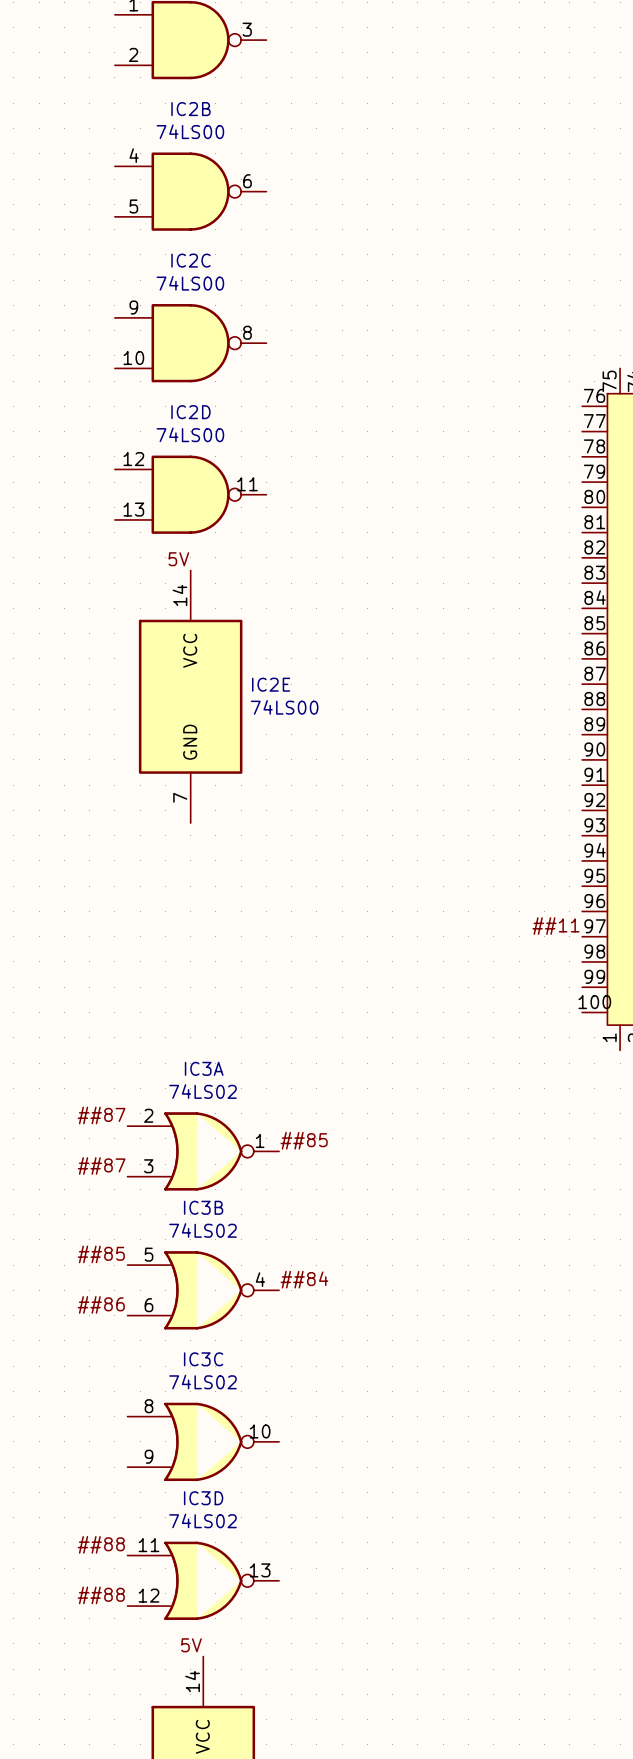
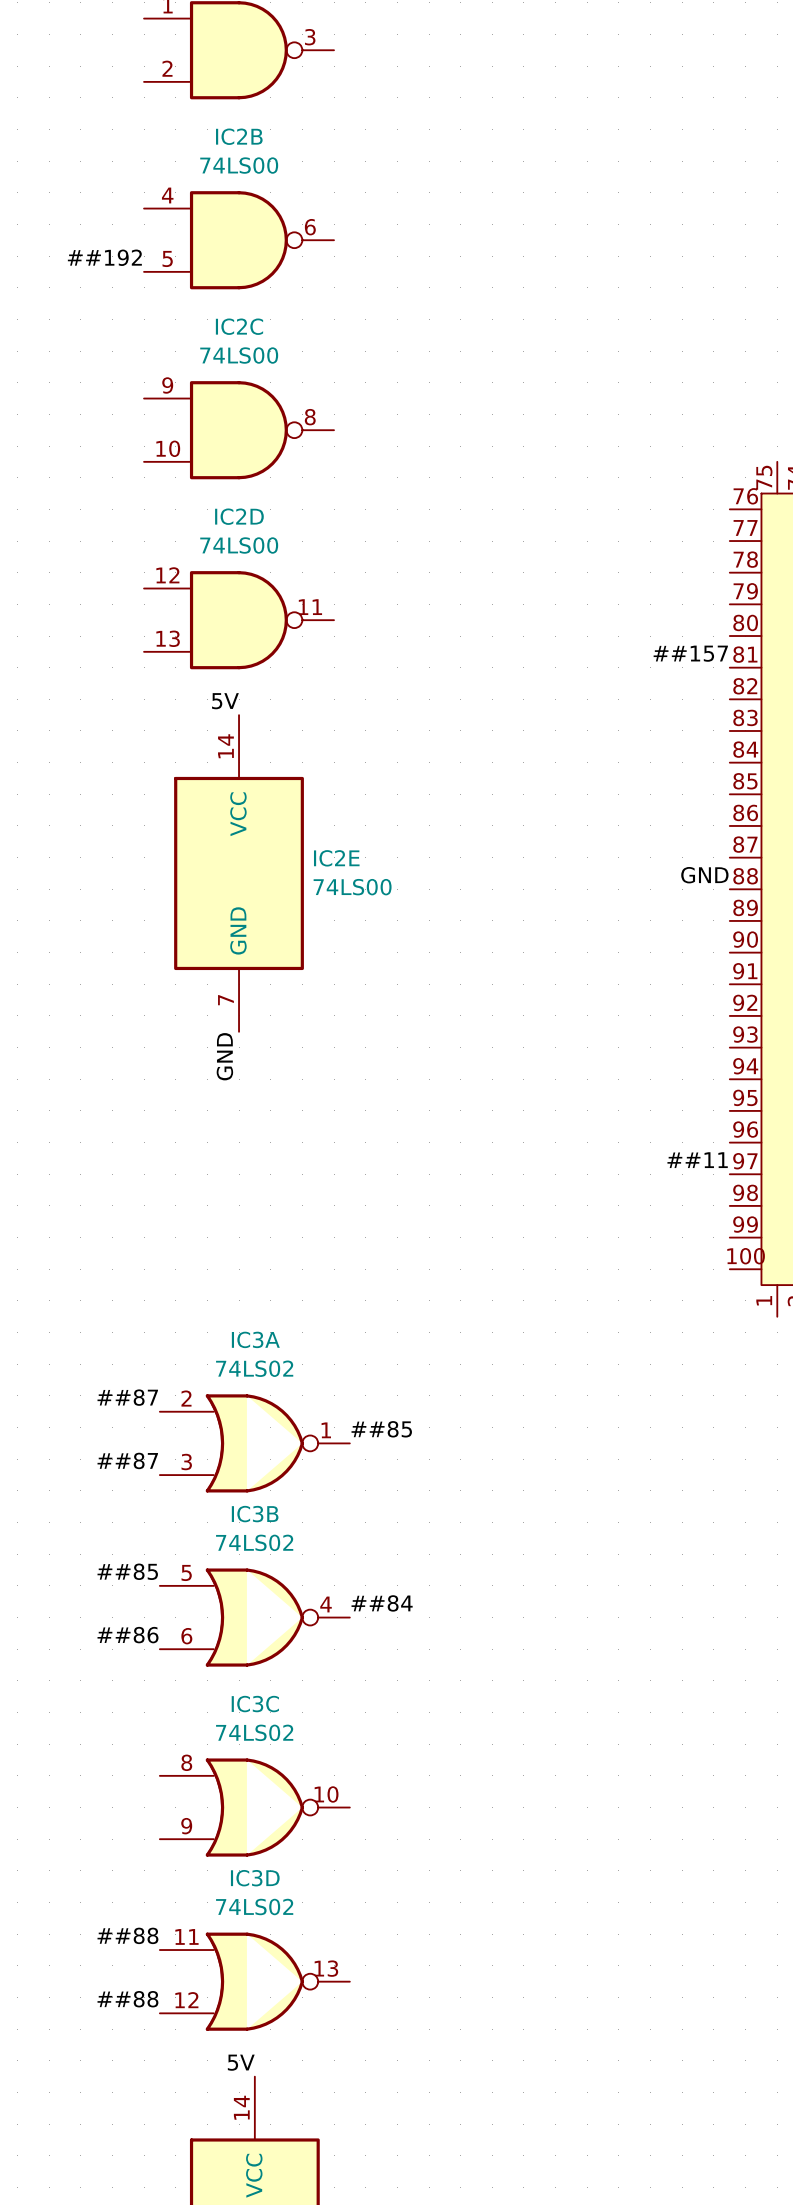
label: none -> ##192 (104, 257)
label: none -> ##157 (690, 653)
label: none -> GND (704, 875)
label: none -> GND (224, 1056)

